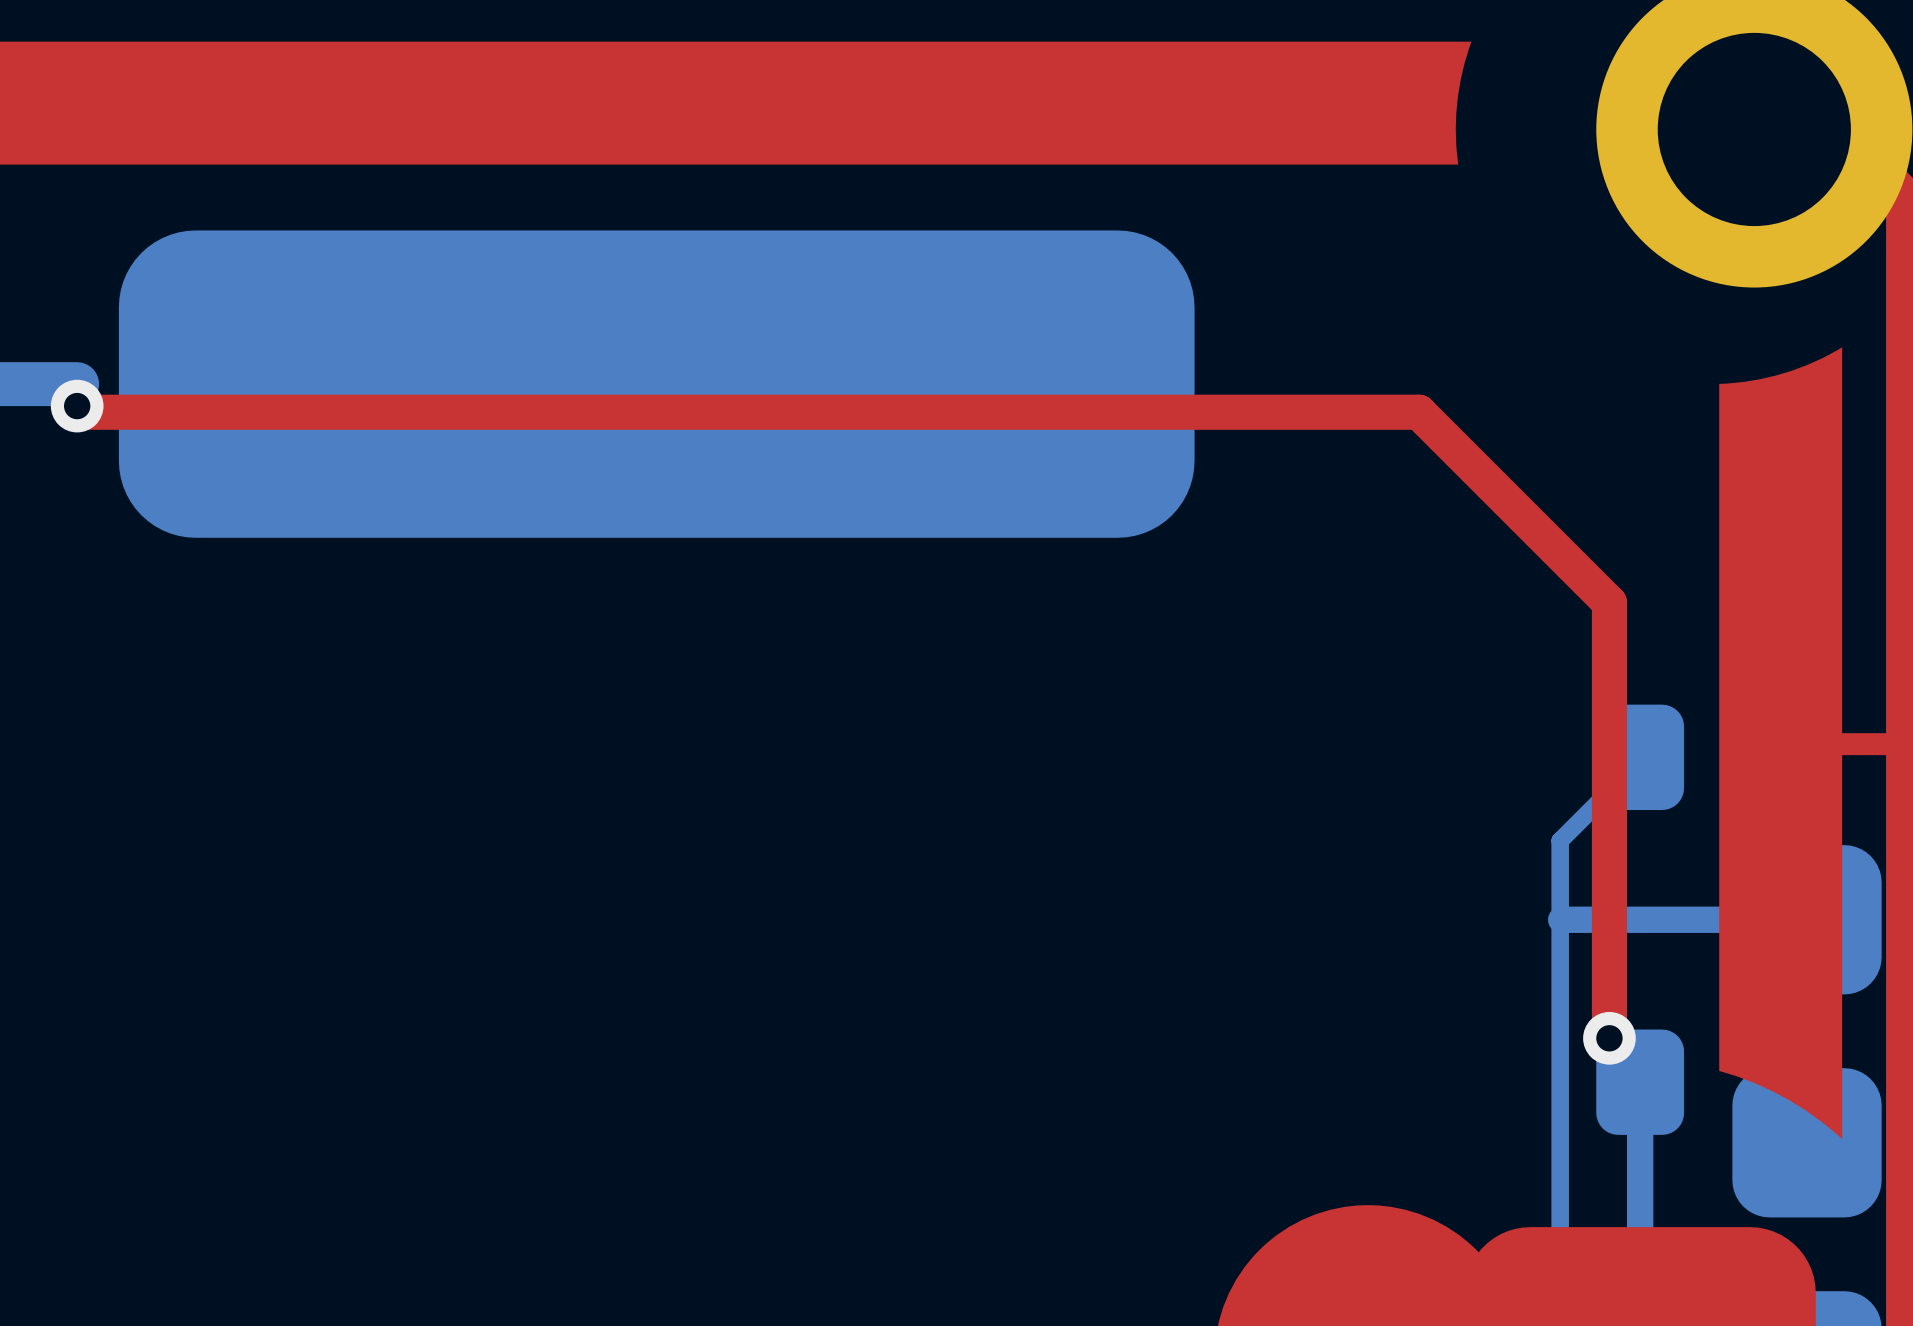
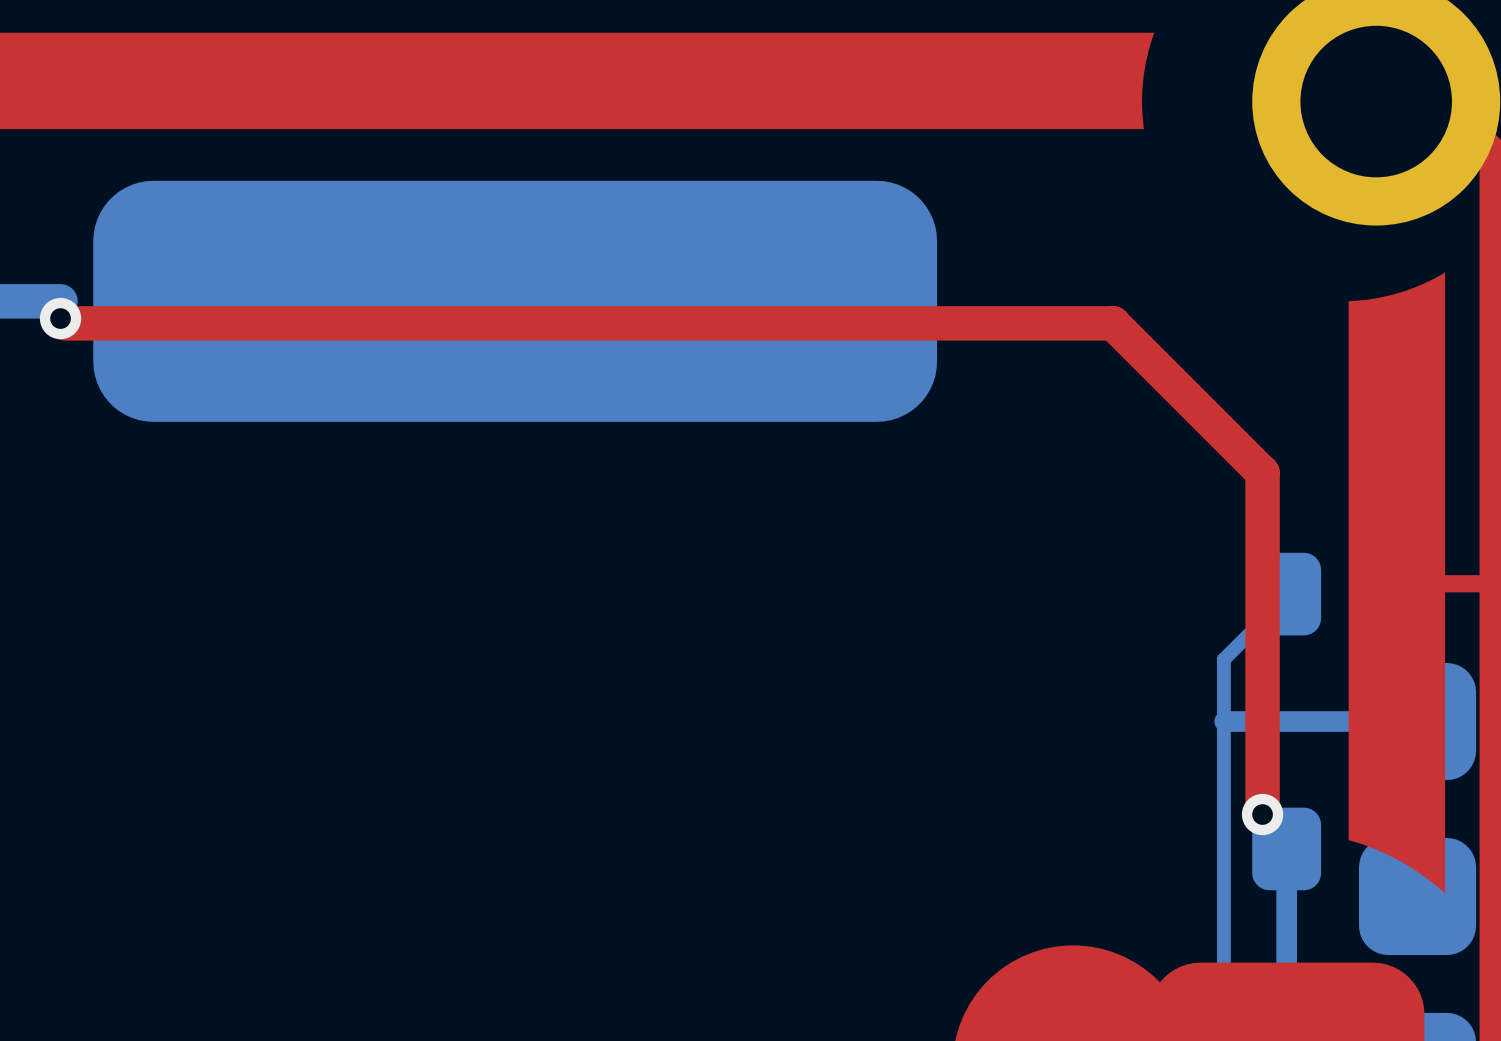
top track width: thin (83, 412) (1418, 412) (1609, 602) (1609, 1038) -> thick (65, 323) (1113, 323) (1262, 472) (1262, 814)

